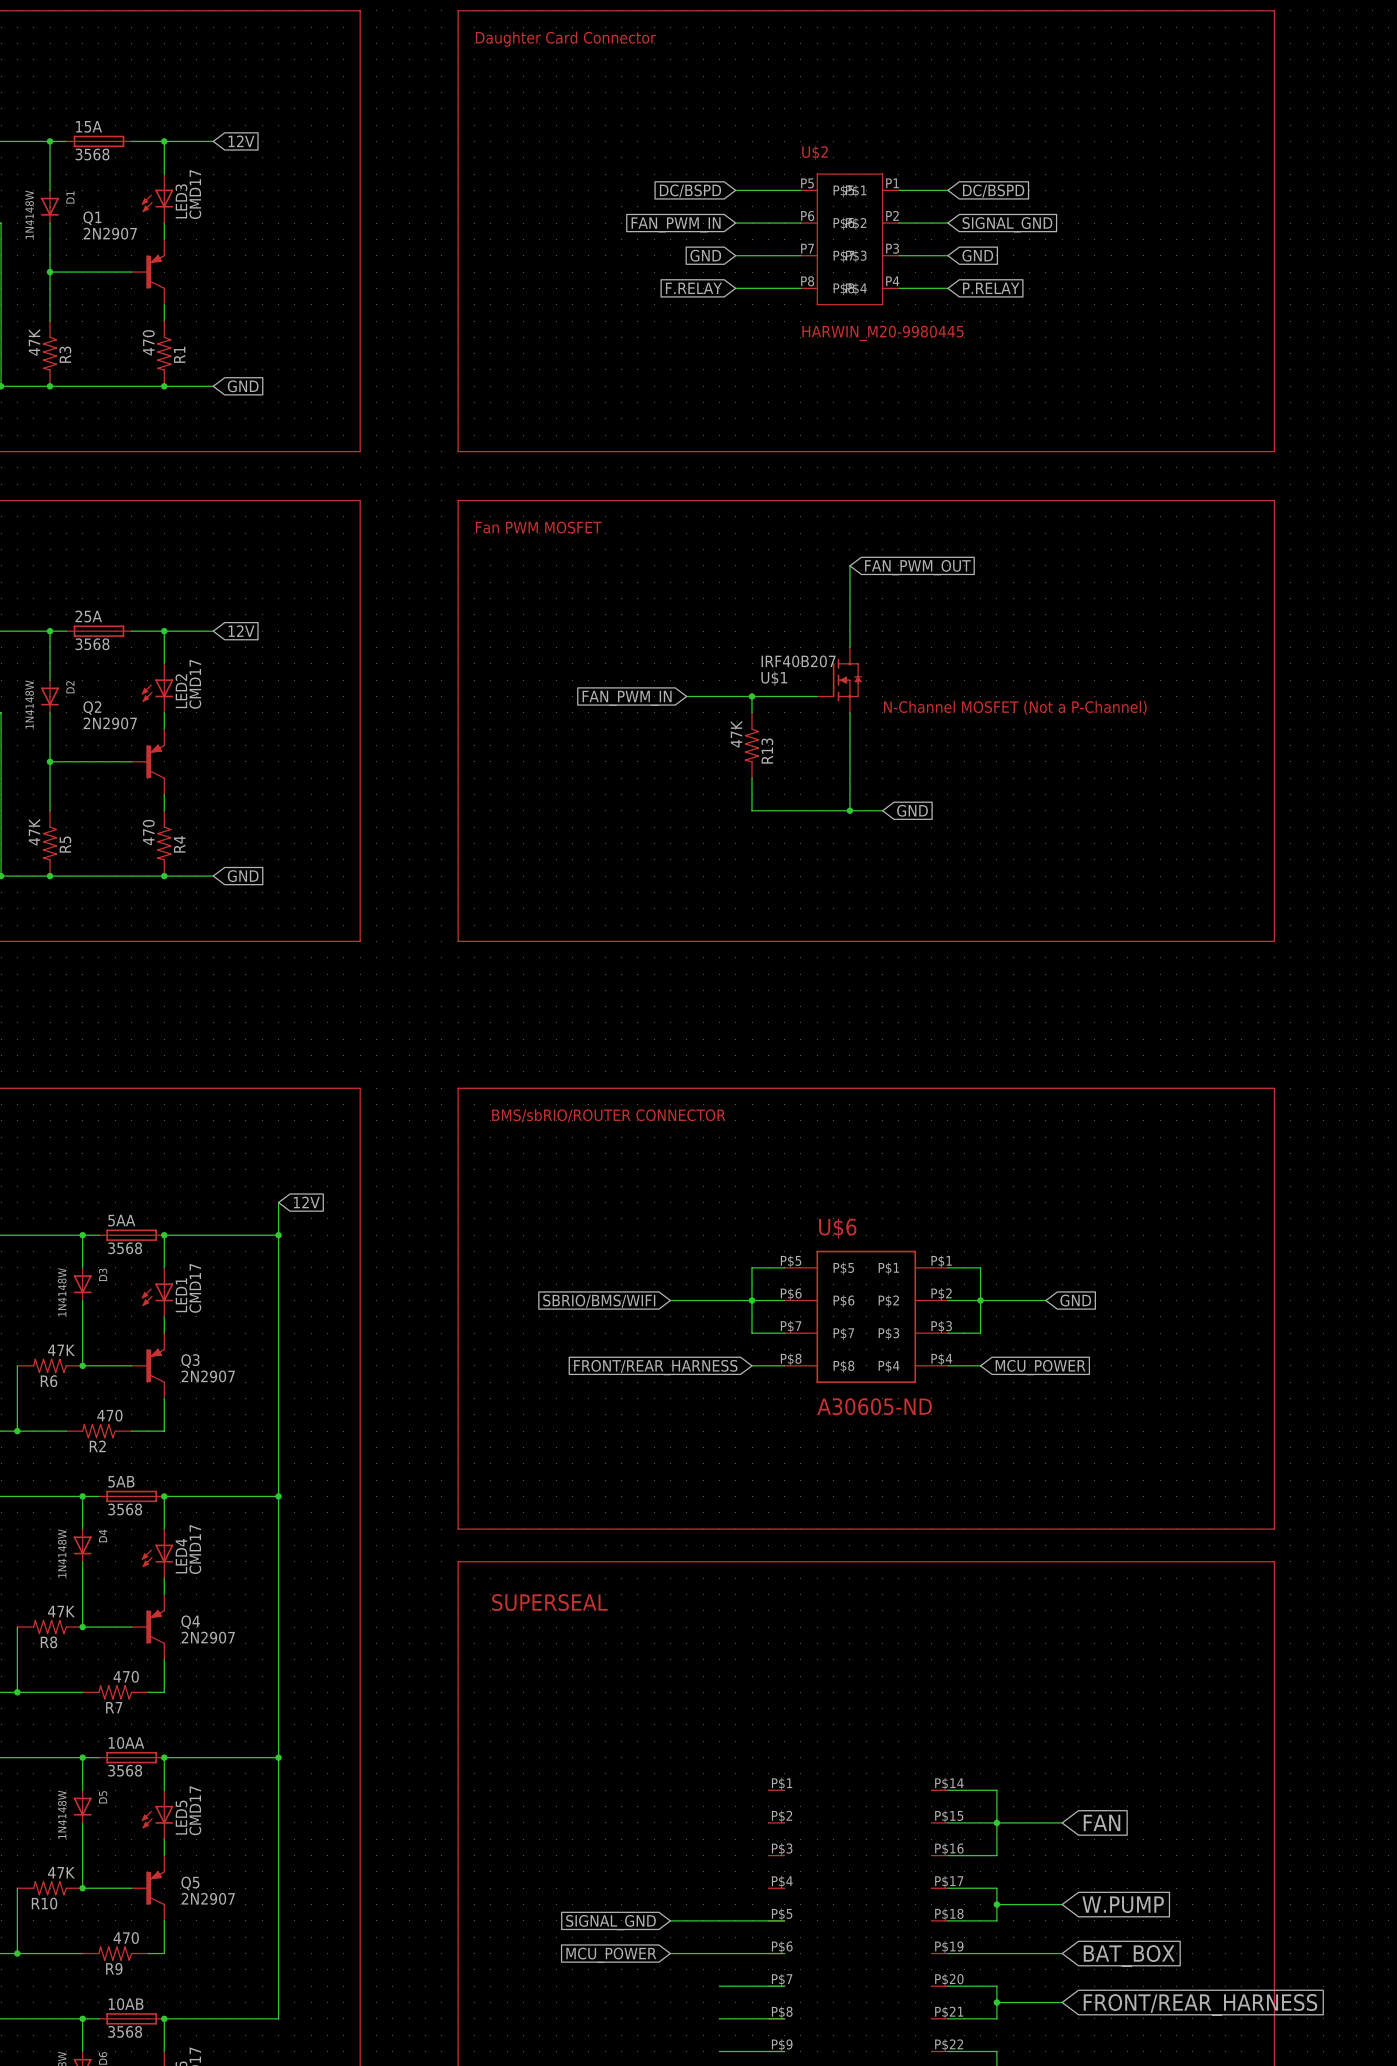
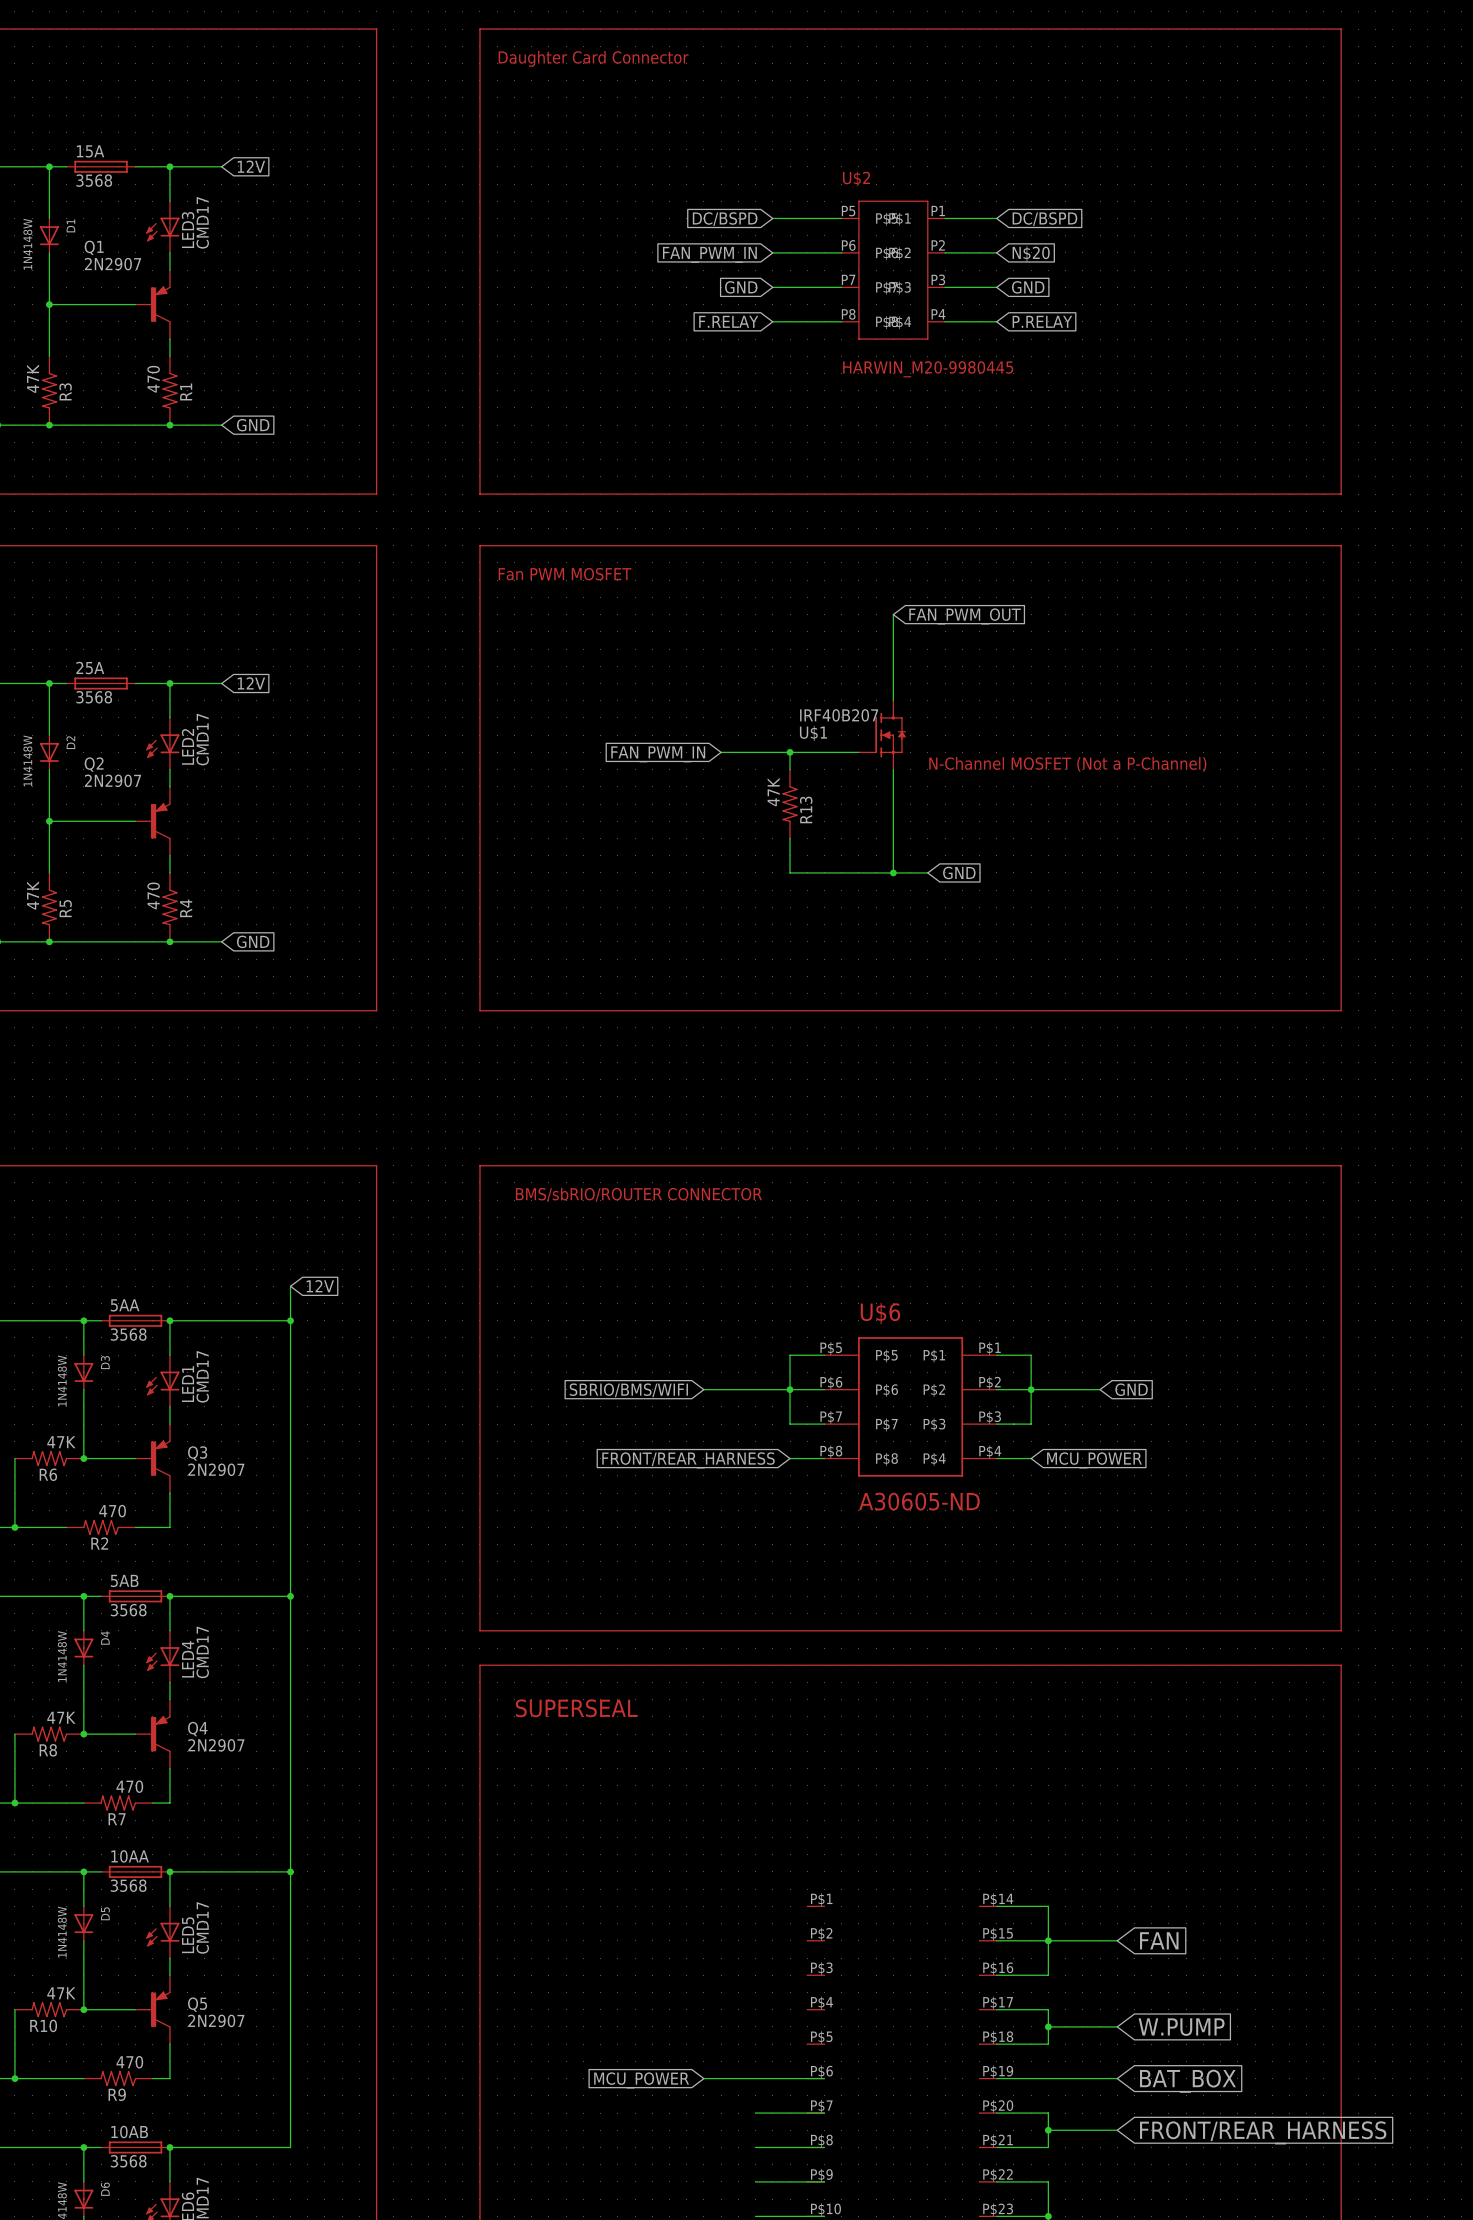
global label: SIGNAL_GND (1007, 224) -> N$20 (1031, 253)
wire: (670, 1920) (784, 1920) -> none
global label: SIGNAL_GND (610, 1922) -> none

